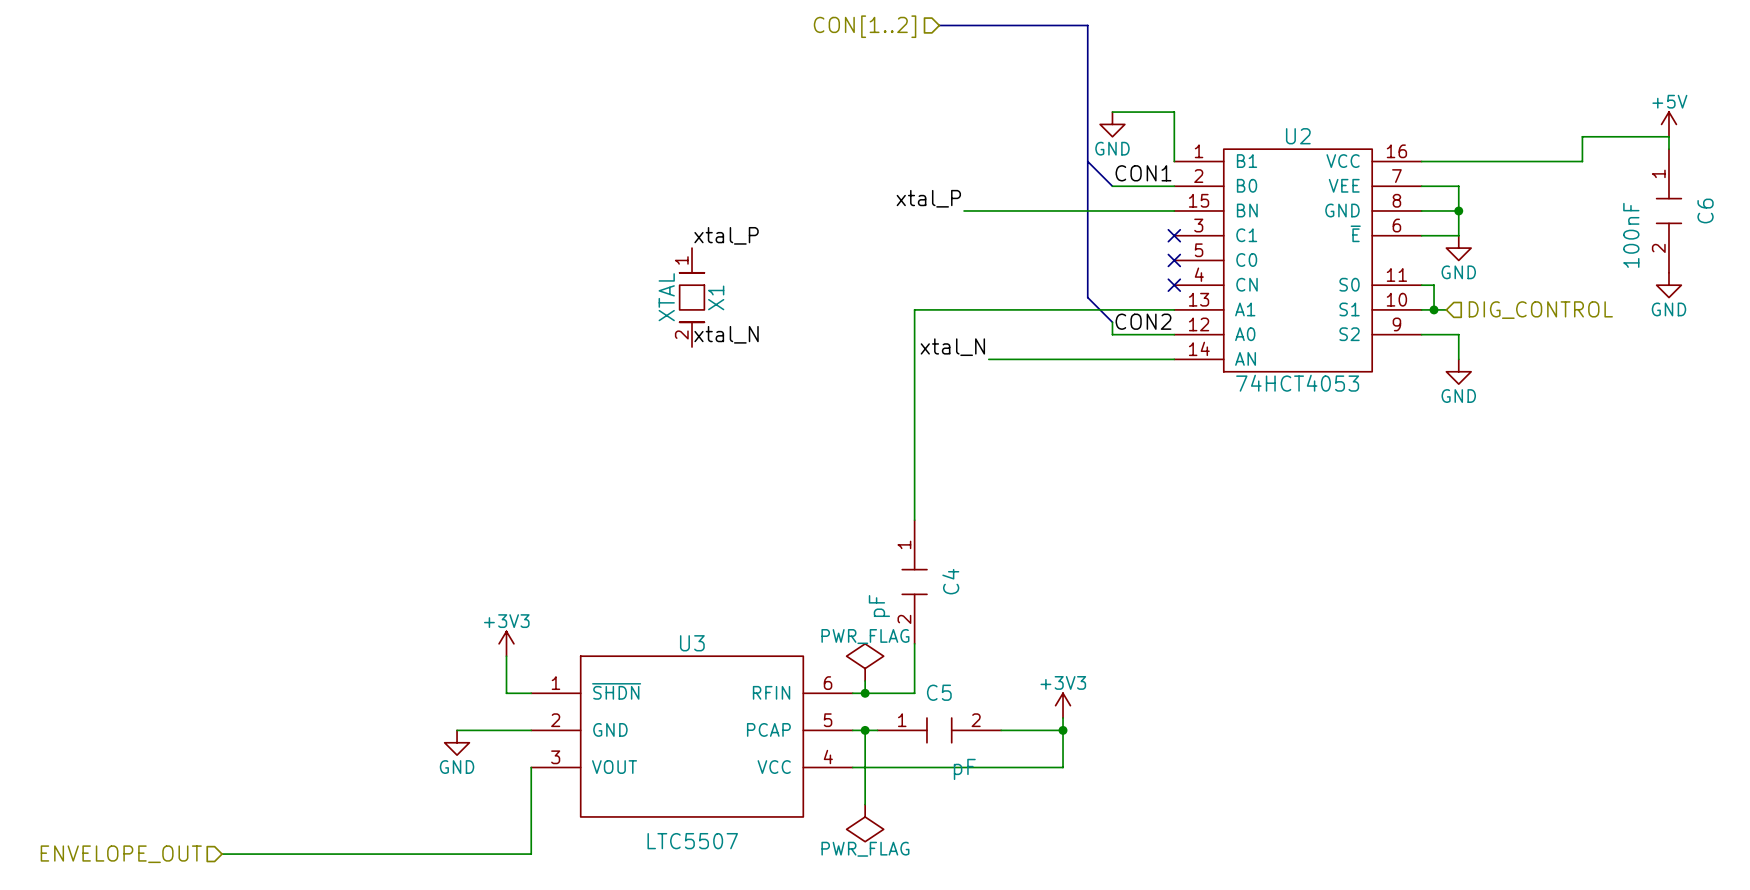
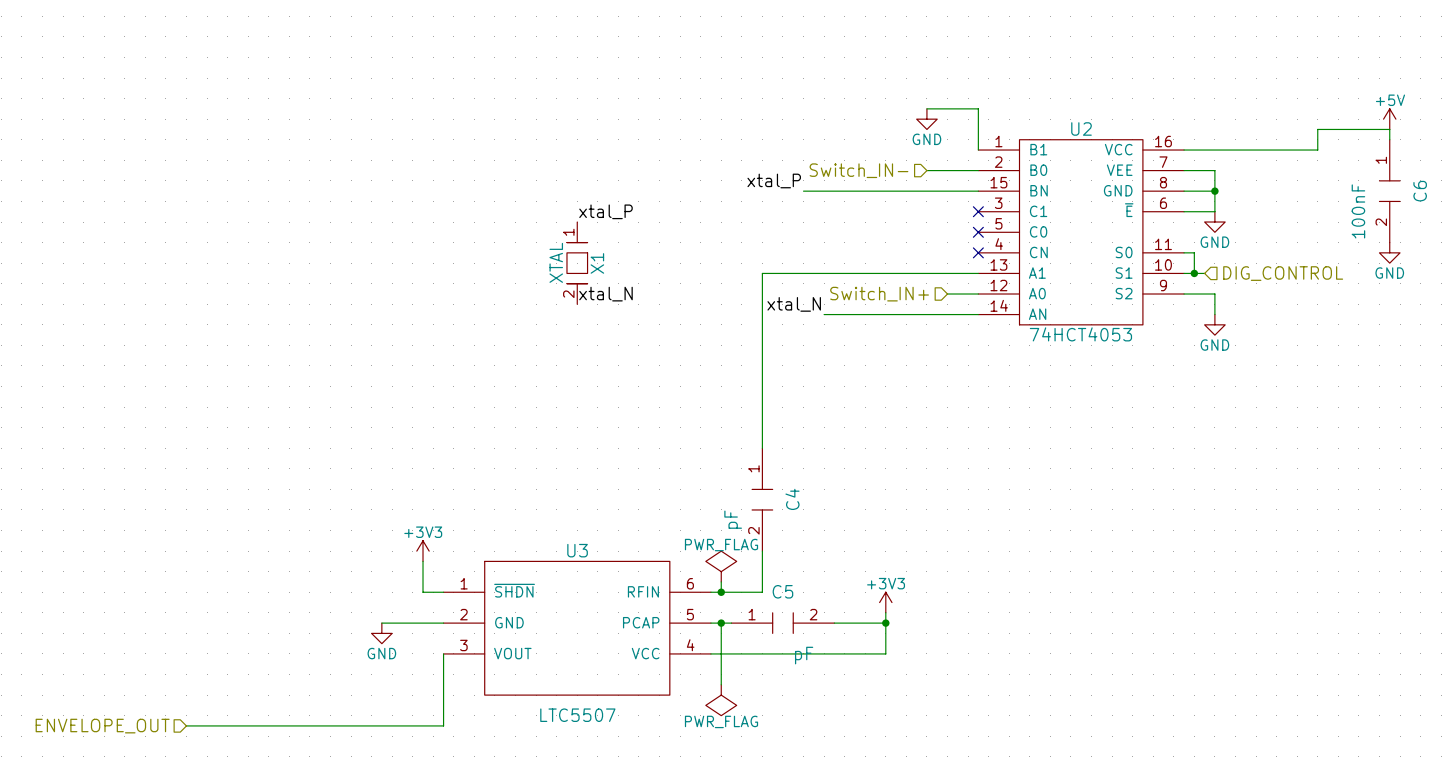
bus: (939, 25) (1087, 25) (1087, 297) (1112, 322) -> none
hierarchical label: CON[1..2] (865, 26) -> none
bus: (1087, 161) (1112, 186) -> none
label: CON1 (1143, 173) -> none
hierarchical label: none -> Switch_IN- (858, 170)
label: CON2 (1143, 321) -> none
wire: (1112, 322) (1112, 334) (1137, 334) -> none
hierarchical label: none -> Switch_IN+ (879, 294)

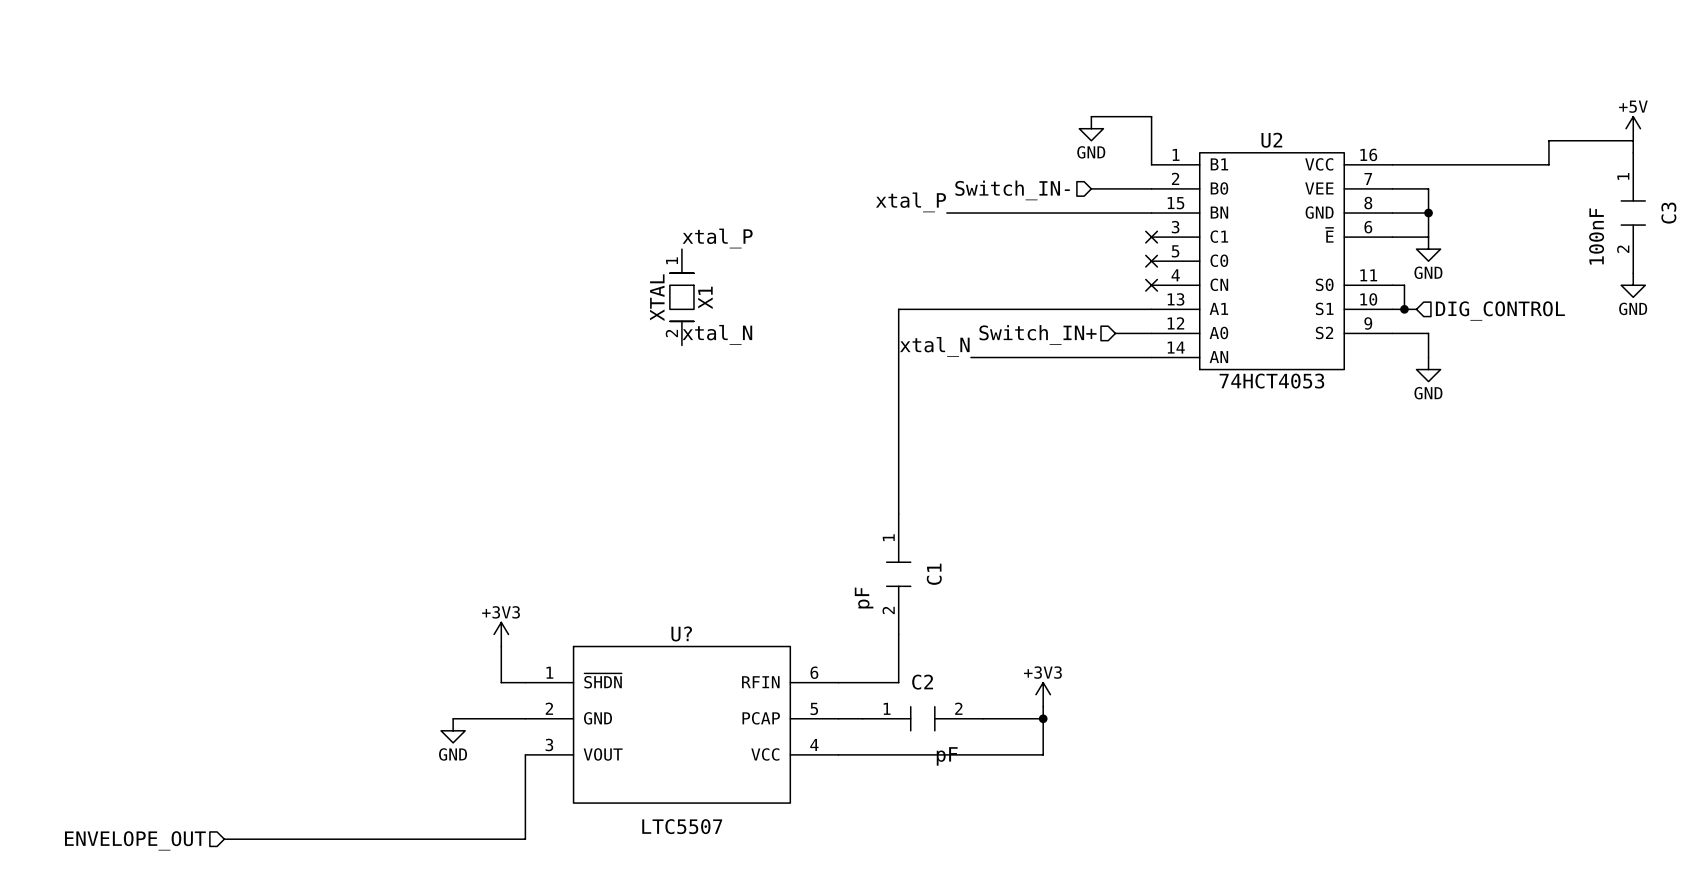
C6 name: C6 (1420, 191) -> C3 (1668, 213)
C4 name: C4 (792, 499) -> C1 (934, 574)
U3 name: U3 (577, 550) -> U? (681, 633)
power symbol: PWR_FLAG (721, 566) -> none
wire: (721, 581) (721, 592) -> none
C5 name: C5 (782, 591) -> C2 (922, 682)
junction: (721, 592) -> none
wire: (721, 623) (721, 684) -> none
junction: (721, 623) -> none
power symbol: PWR_FLAG (721, 700) -> none

